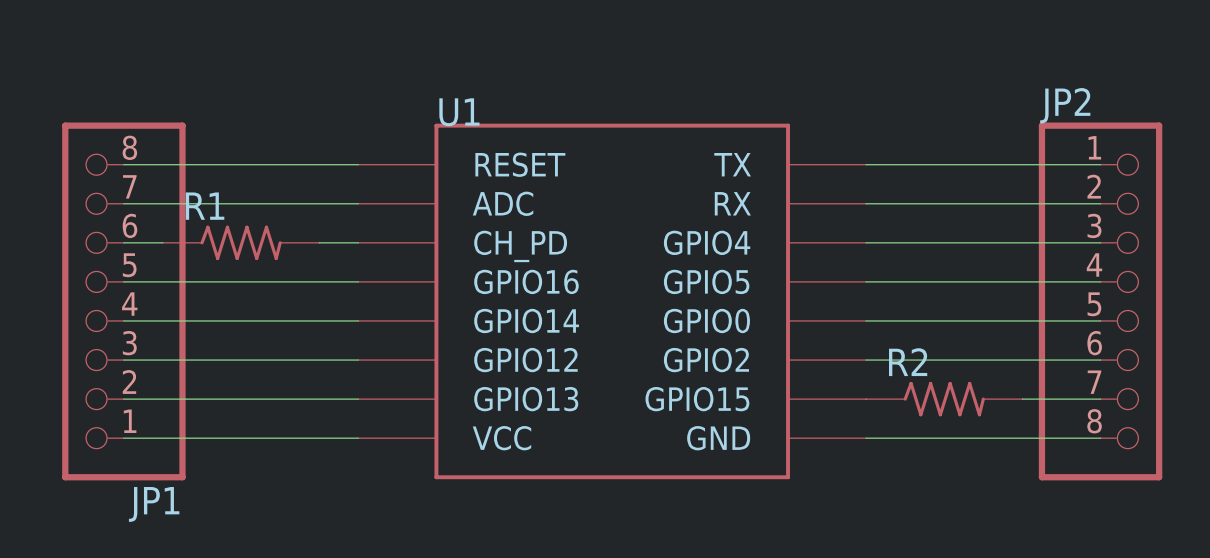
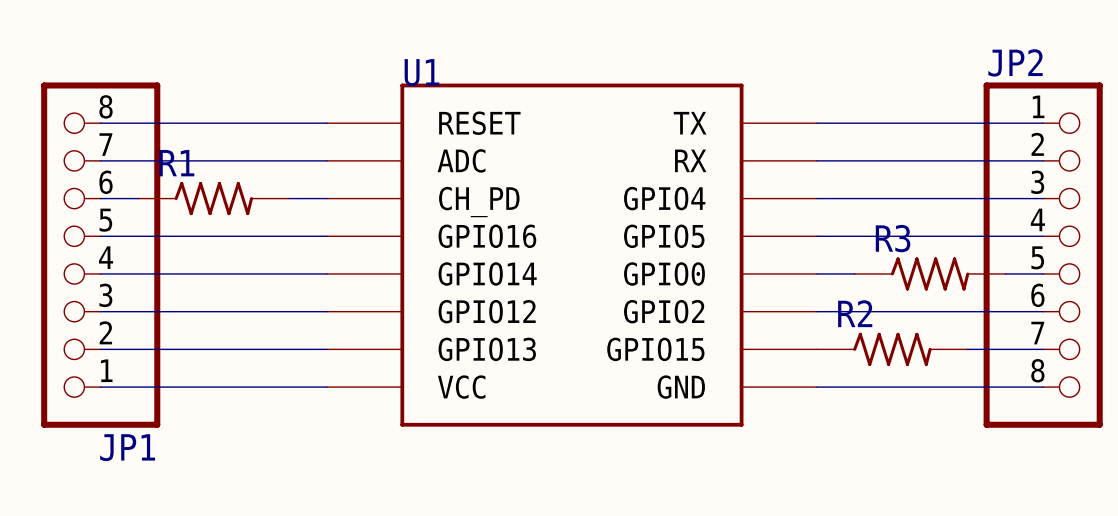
R3: none -> (930, 273)

